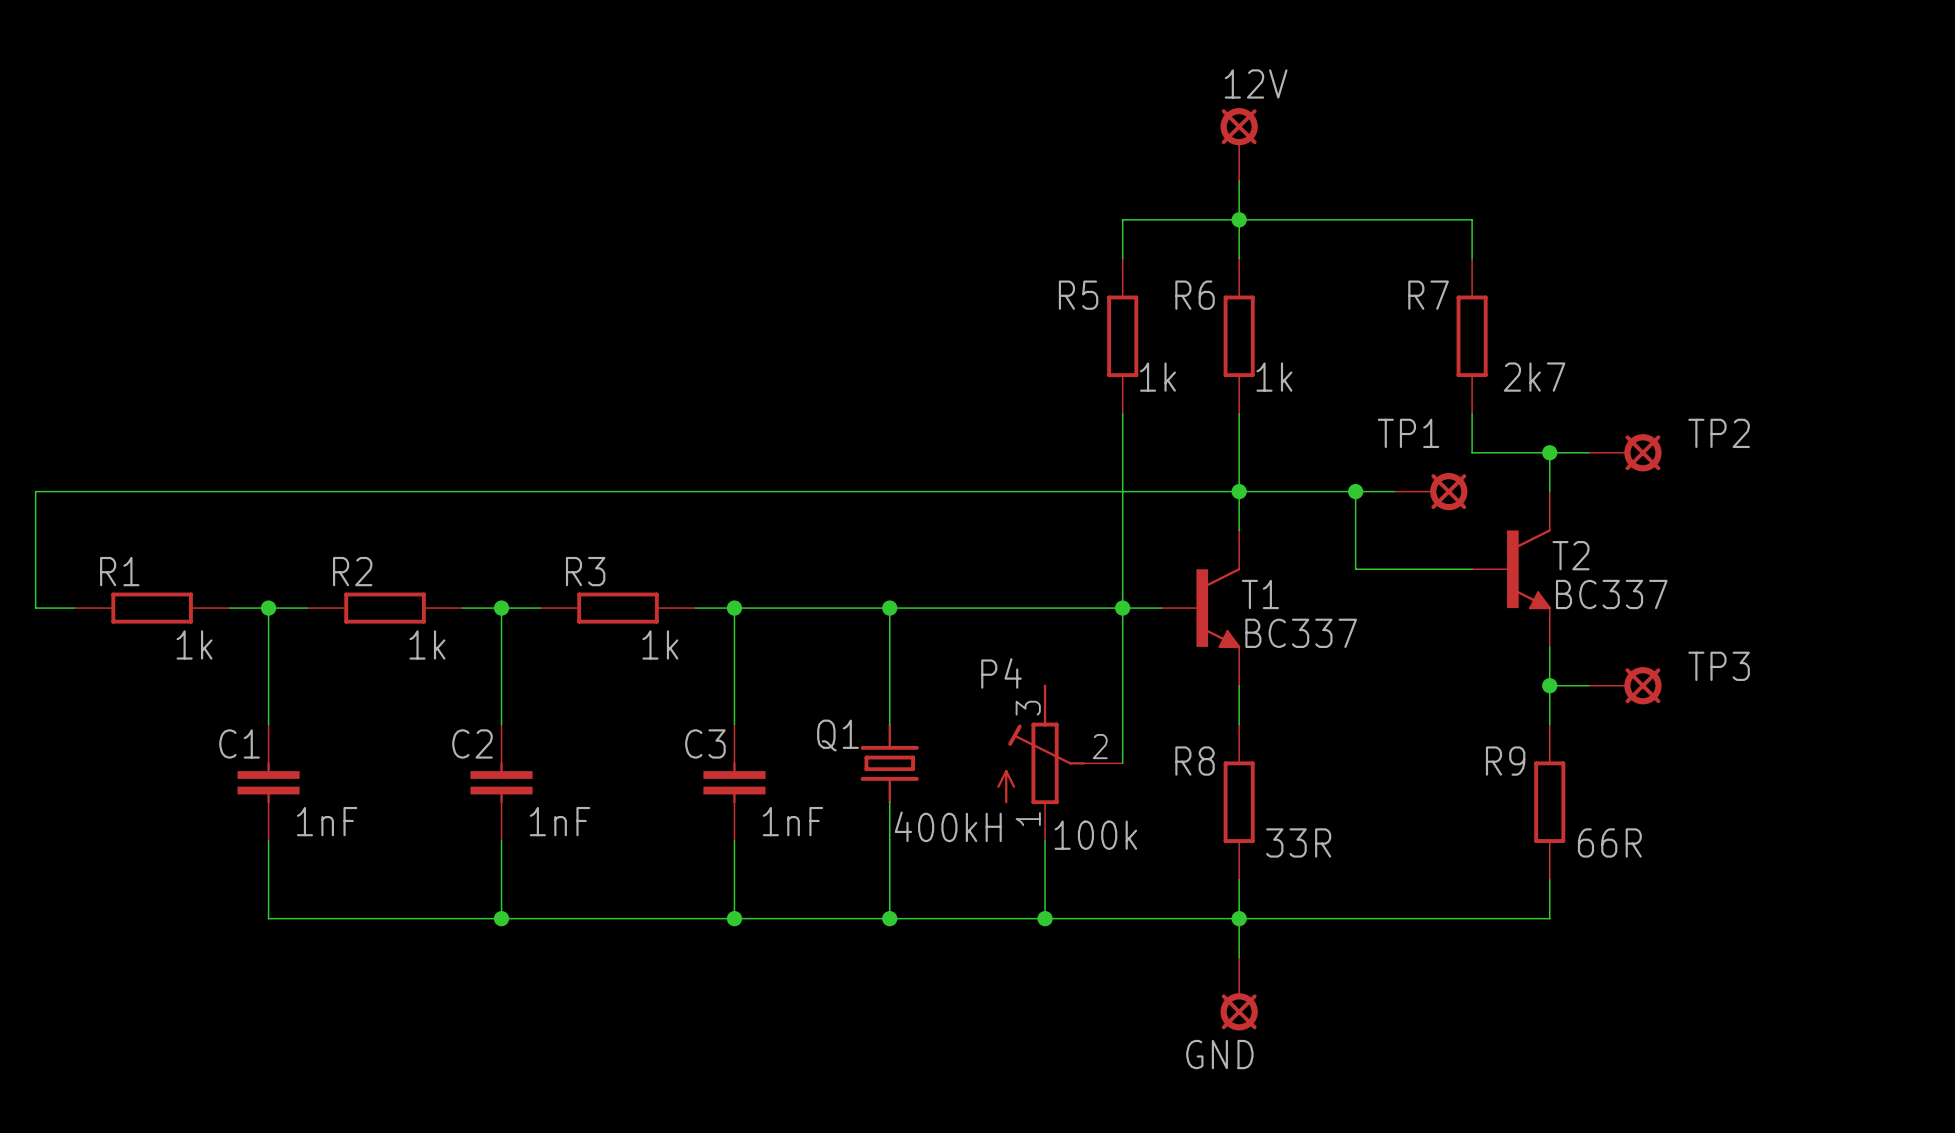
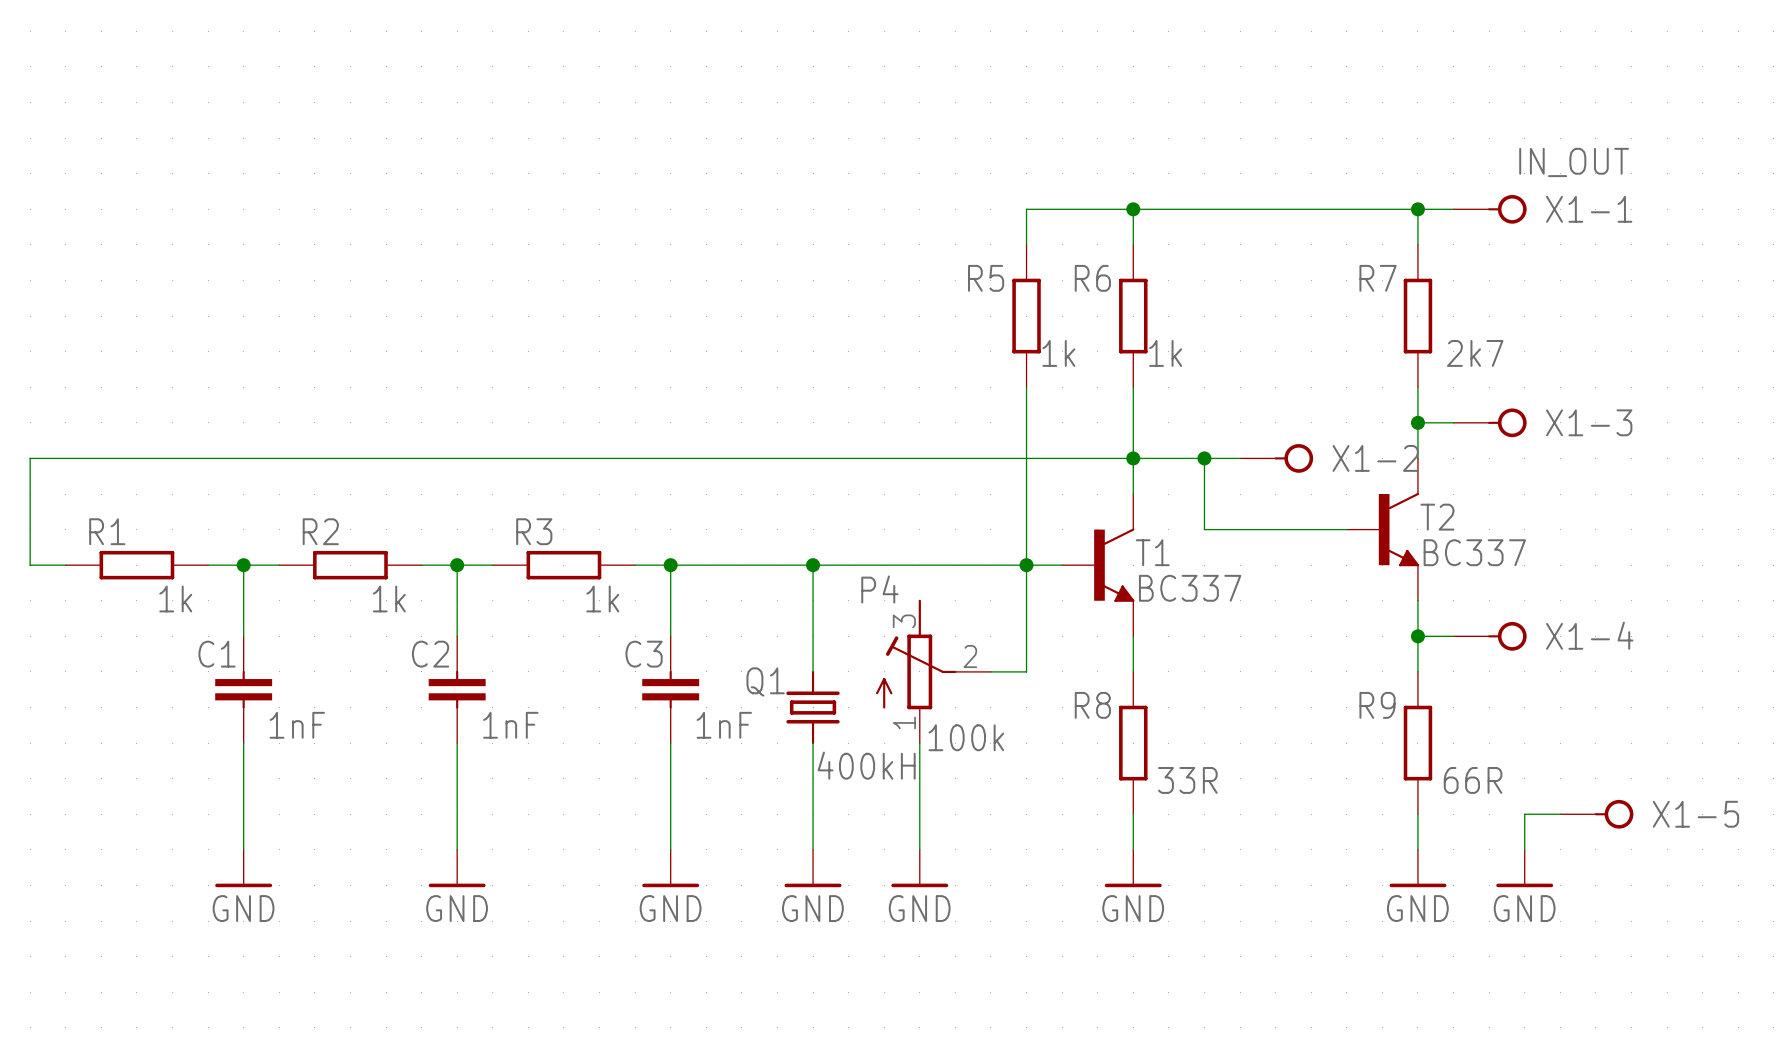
12V: (1239, 144) -> none
wire: (1239, 181) (1239, 219) -> (1417, 209) (1417, 244)
wire: (1472, 219) (1472, 258) -> (1346, 209) (1453, 209)
junction: none -> (1417, 209)
X1-1: none -> (1490, 209)
R7 position: (1472, 336) -> (1417, 316)
wire: (1472, 413) (1472, 452) (1549, 452) -> (1417, 387) (1417, 422)
TP2: (1625, 452) -> none
X1-3: none -> (1490, 422)
junction position: (1355, 491) -> (1204, 458)
wire: (1394, 491) (1355, 491) (1355, 569) -> (1204, 458) (1204, 529) (1240, 529)
X1-2: none -> (1276, 458)
TP1: (1430, 491) -> none
TP3: (1625, 685) -> none
X1-4: none -> (1490, 636)
wire: (1122, 724) (1122, 763) -> (1026, 671) (990, 671)
P4 position: (1060, 762) -> (933, 671)
C1 position: (268, 782) -> (243, 689)
C2 position: (501, 782) -> (457, 689)
C3 position: (734, 782) -> (670, 689)
wire: none -> (919, 743) (919, 849)
wire: (1045, 841) (1045, 918) -> none
wire: none -> (1560, 814) (1524, 814) (1524, 849)
X1-5: none -> IN_OUT (1596, 814)
wire: (268, 918) (1549, 918) -> none
junction: (501, 918) -> none
junction: (734, 918) -> none
junction: (889, 918) -> none
junction: (1045, 918) -> none
junction: (1239, 918) -> none
power symbol: none -> GND (243, 868)
power symbol: none -> GND (457, 868)
power symbol: none -> GND (670, 868)
power symbol: none -> GND (813, 868)
power symbol: none -> GND (919, 868)
power symbol: none -> GND (1133, 868)
power symbol: none -> GND (1417, 868)
power symbol: none -> GND (1524, 868)
GND: (1239, 993) -> none

